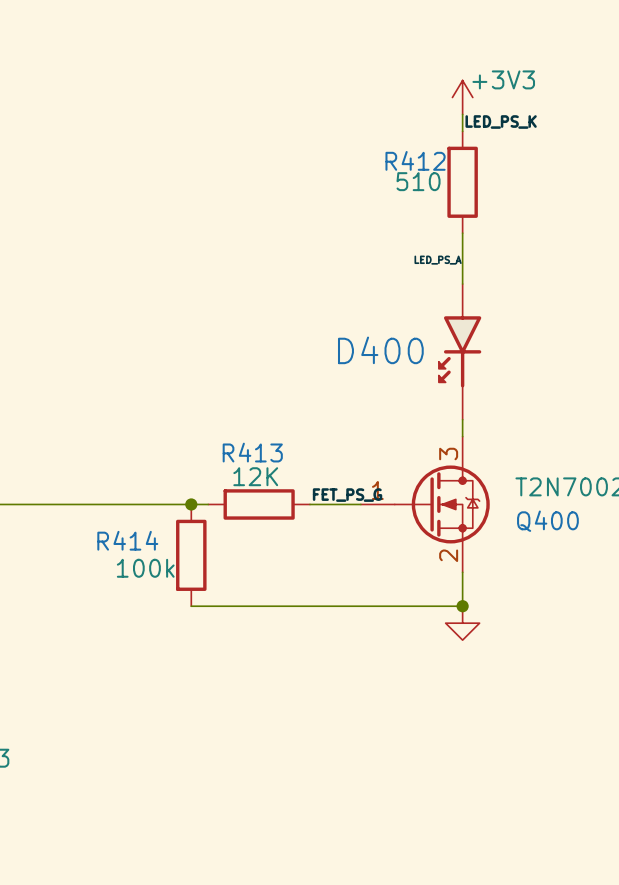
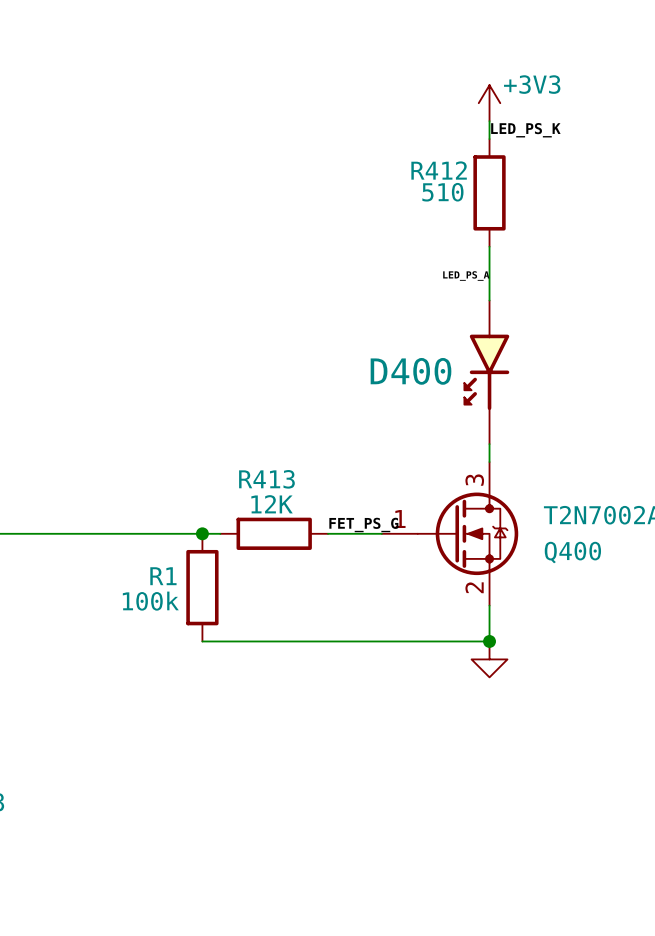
R414 name: R414 (127, 540) -> R1 (163, 576)

